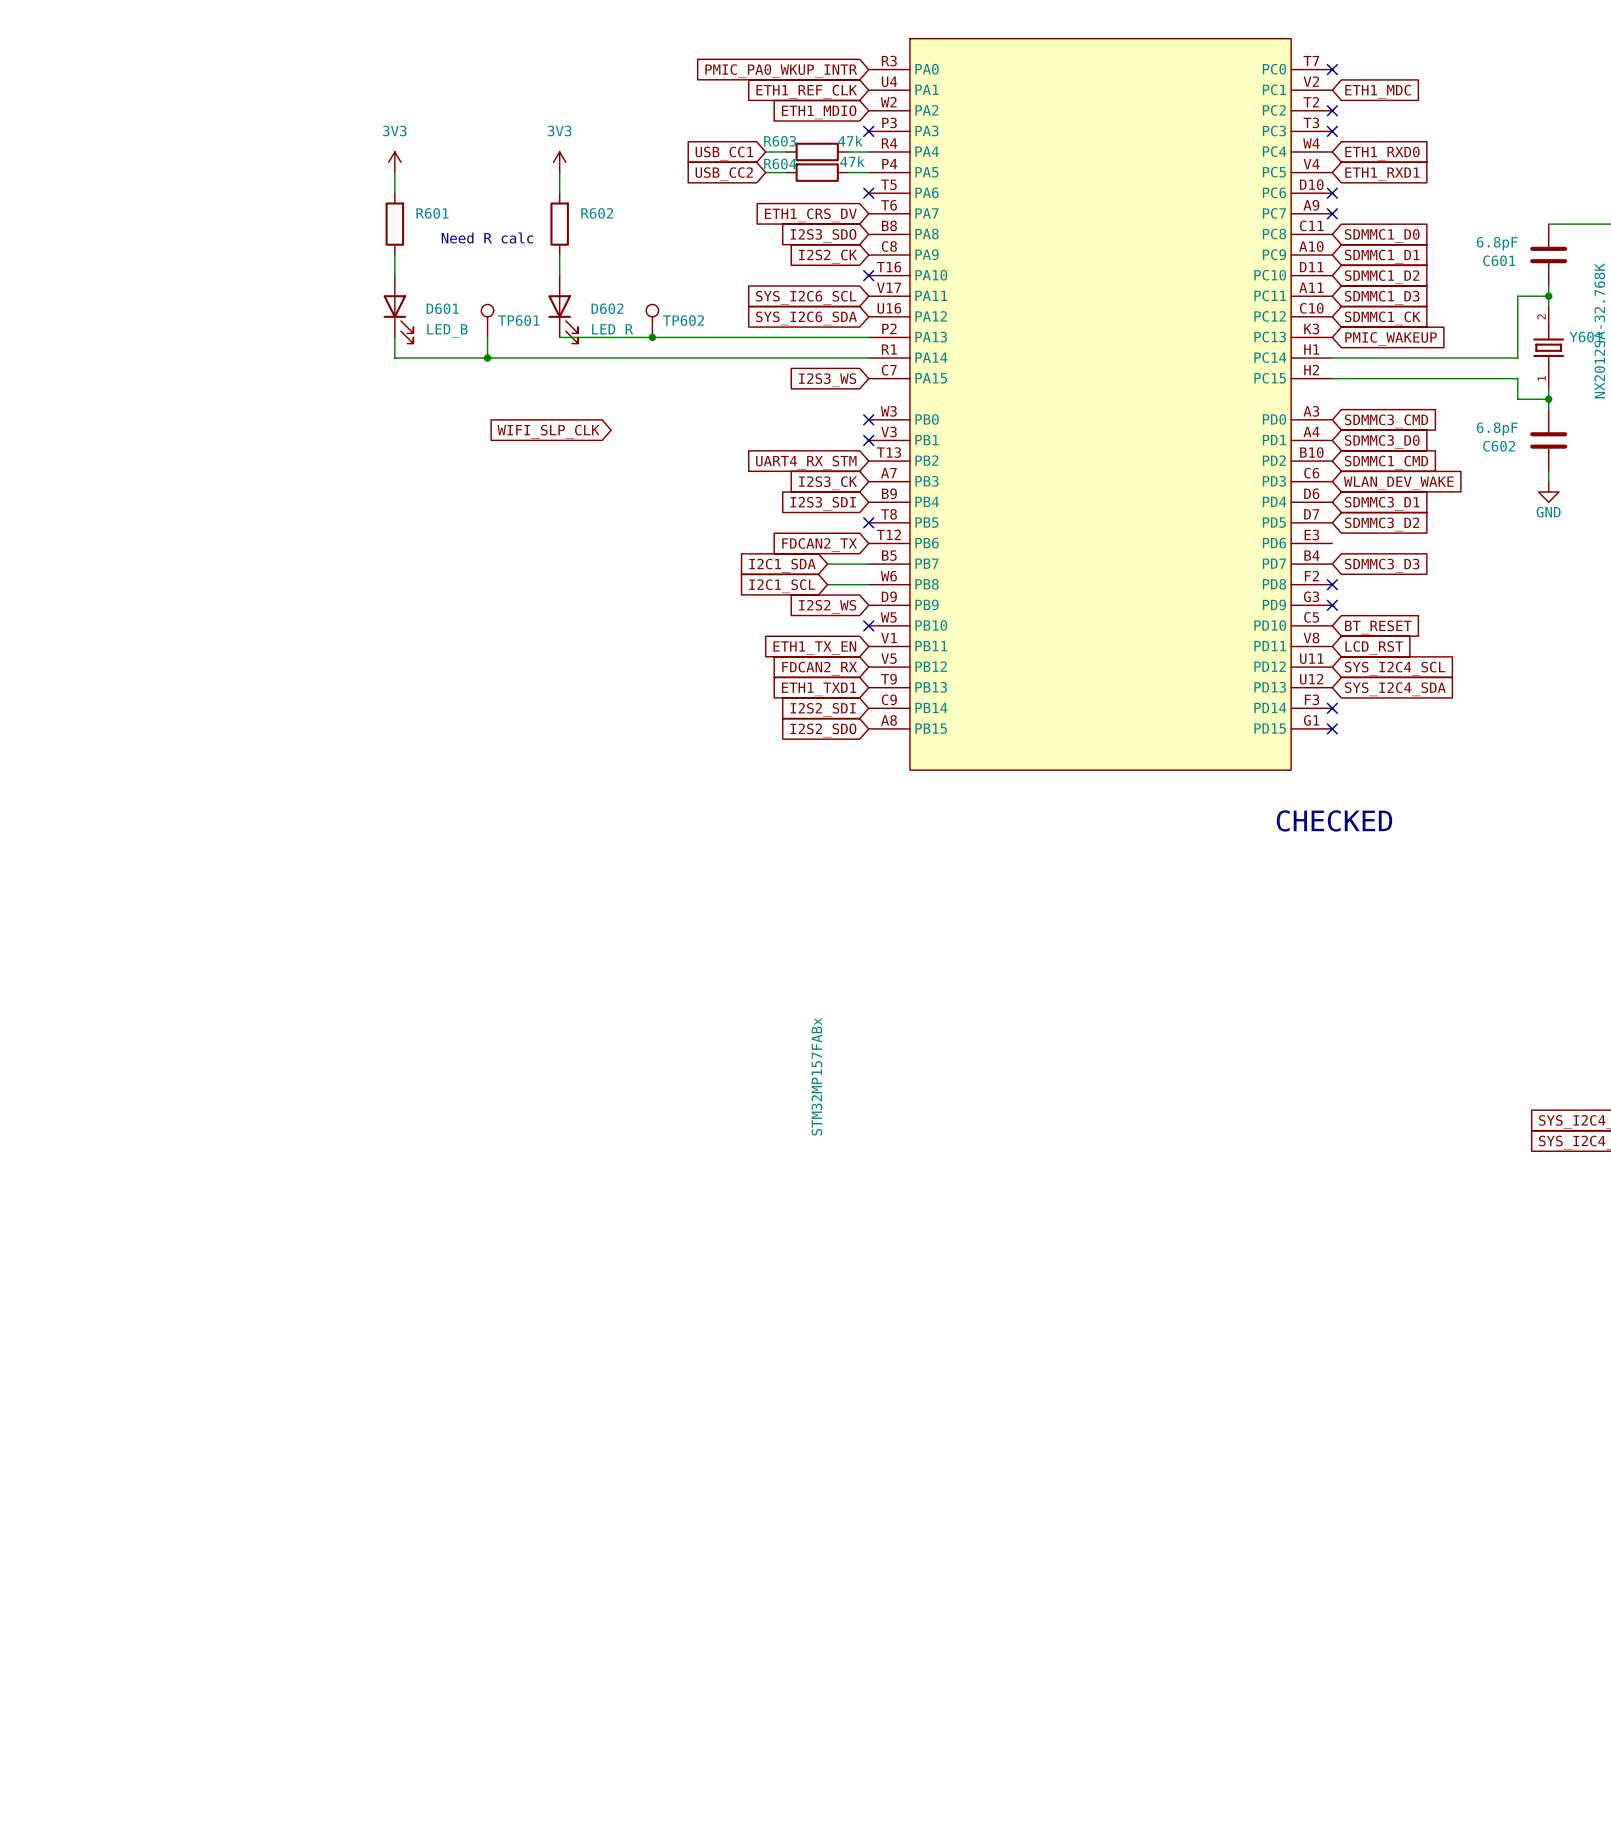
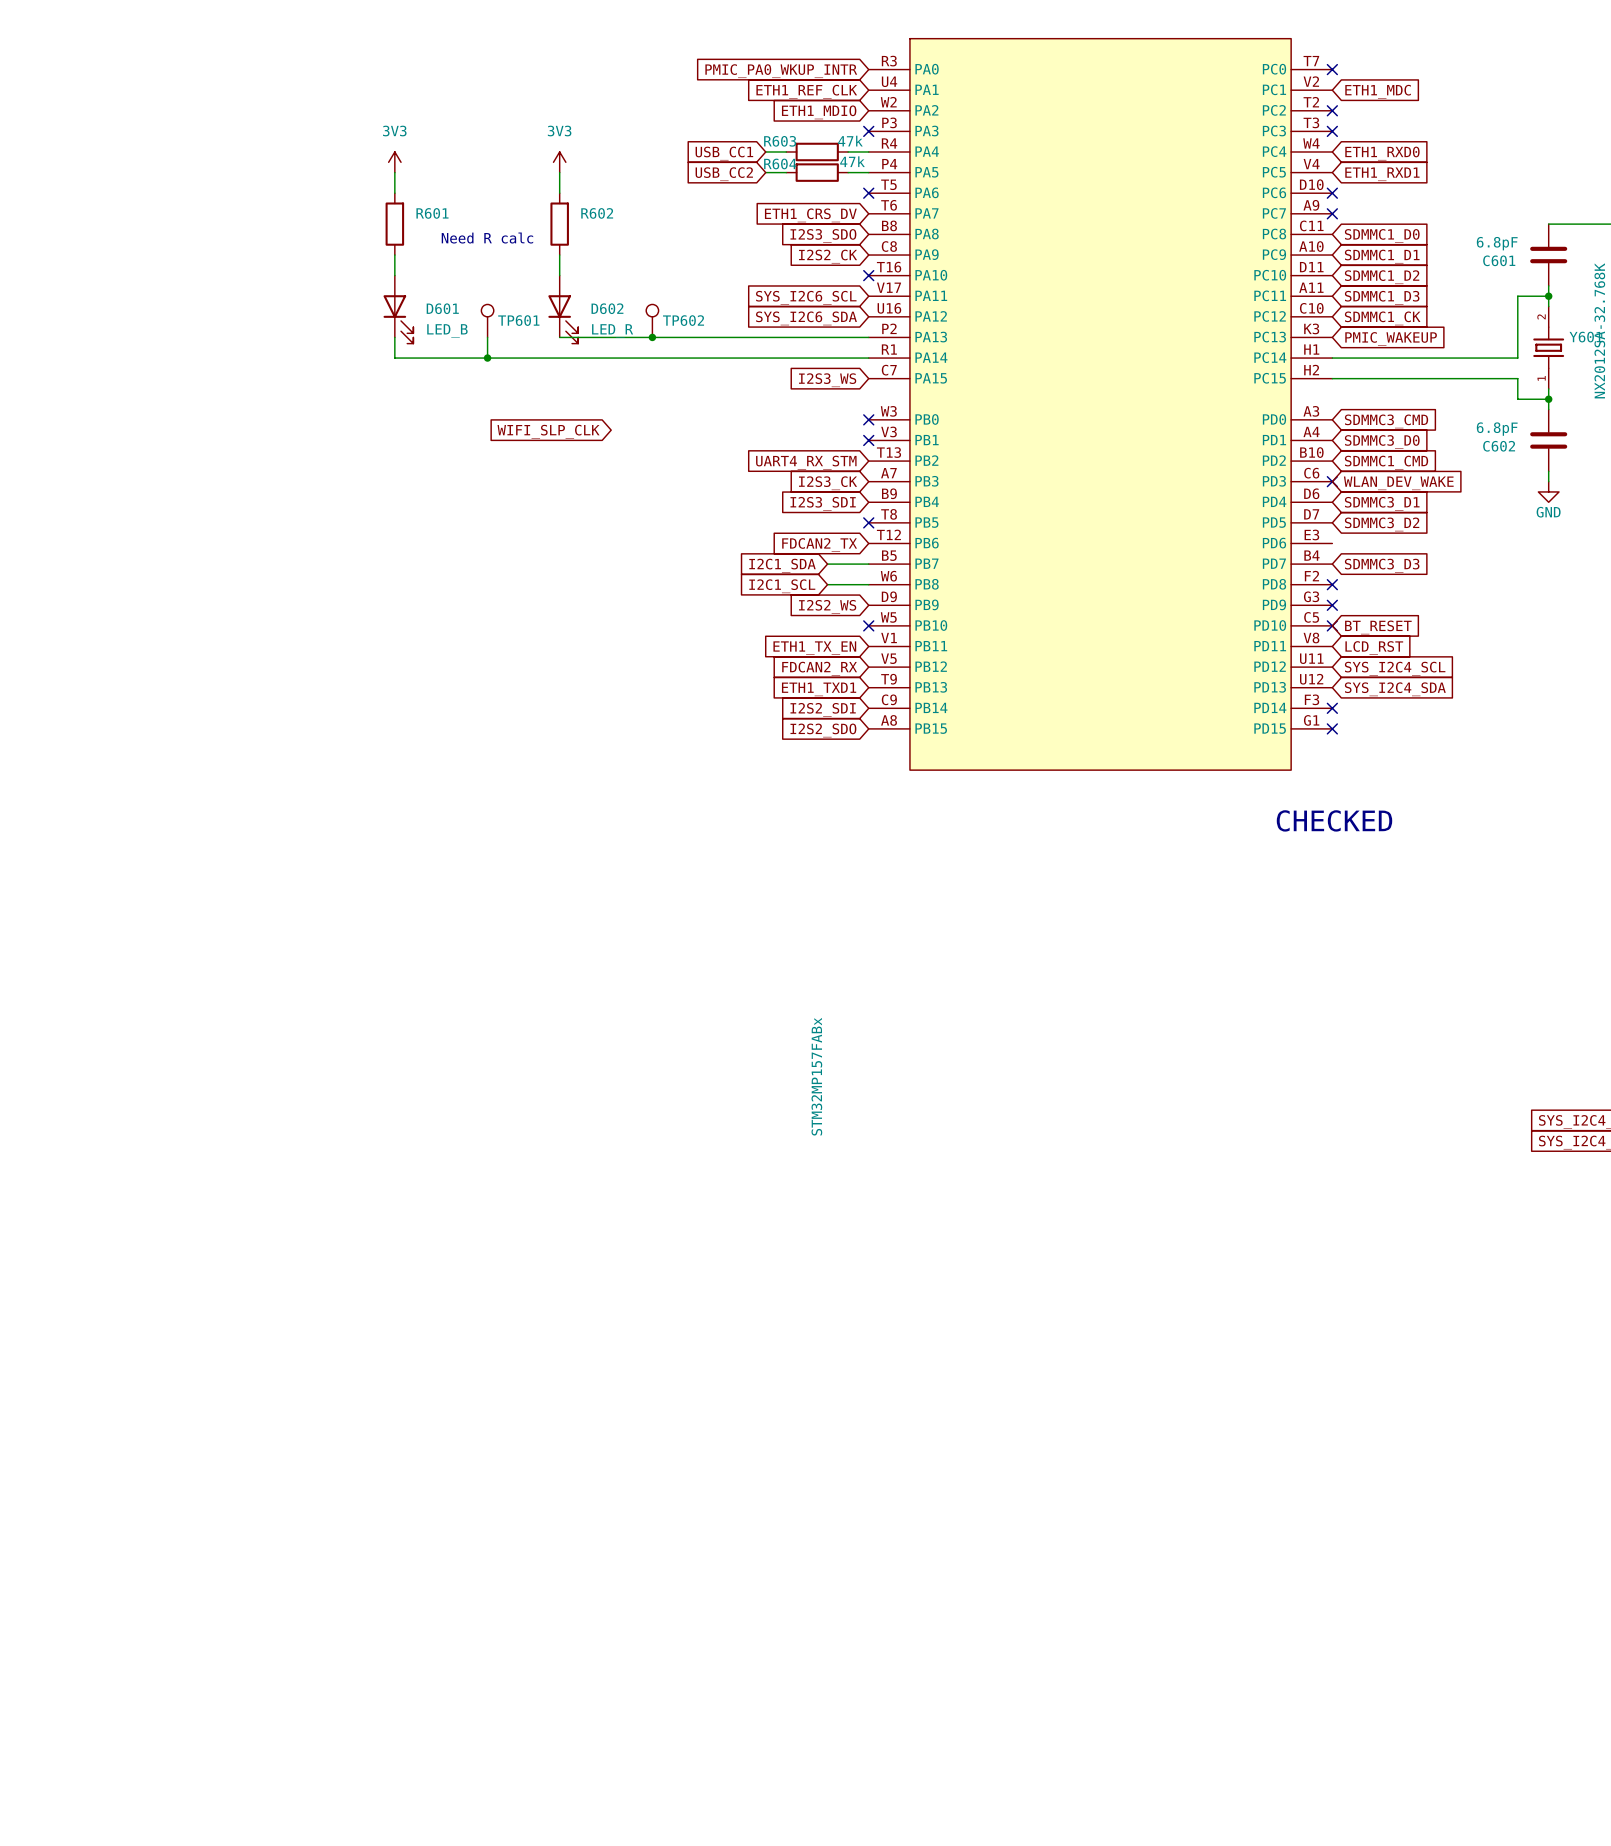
no-connect mark: none -> (1332, 481)
no-connect mark: none -> (1332, 625)

